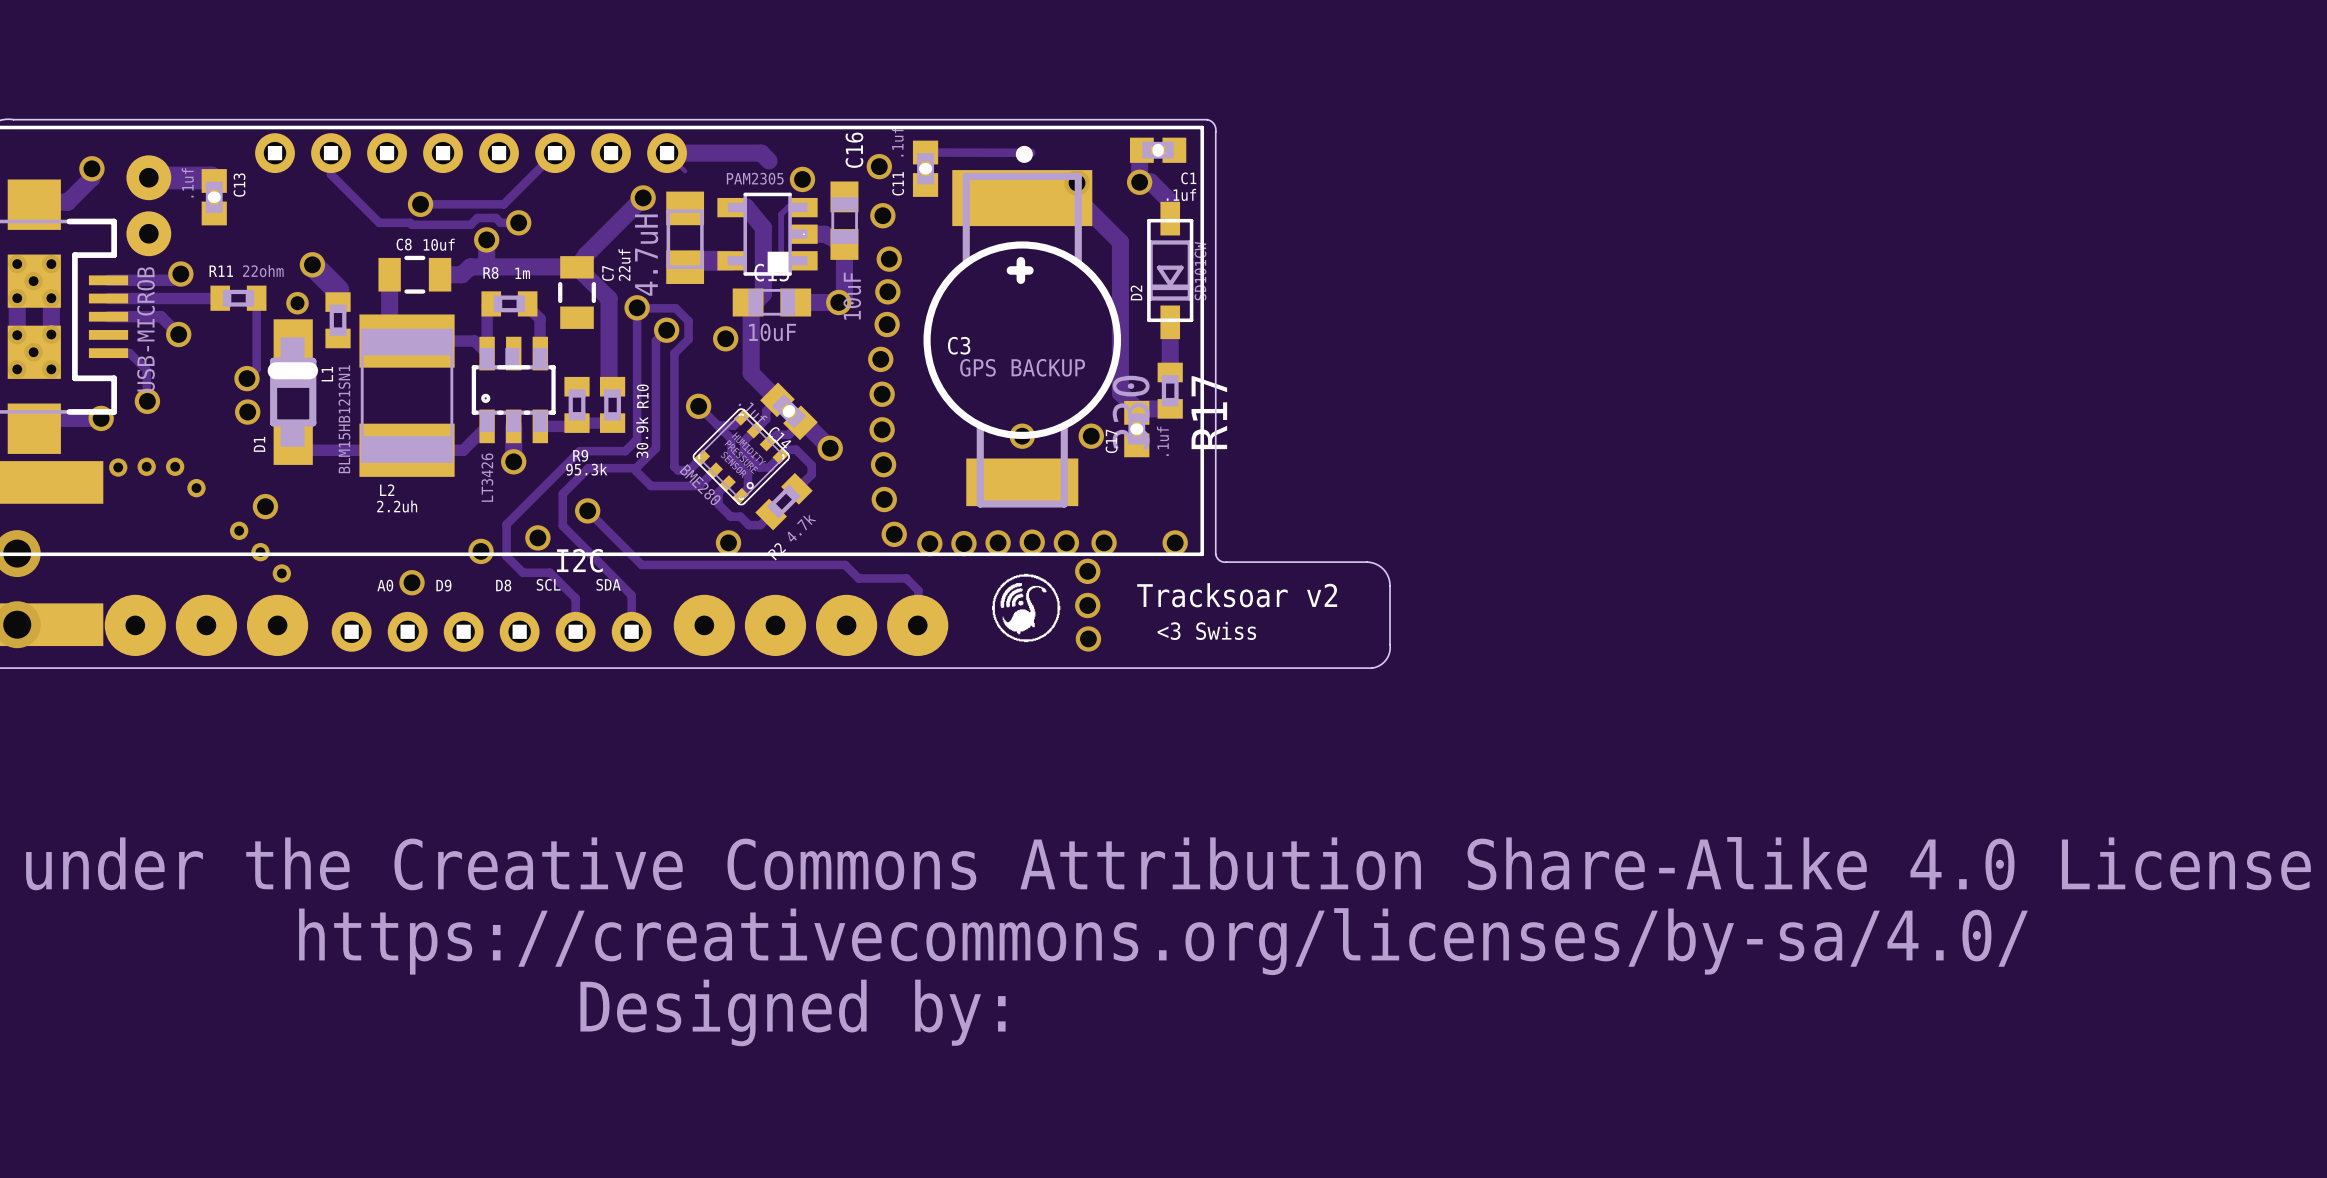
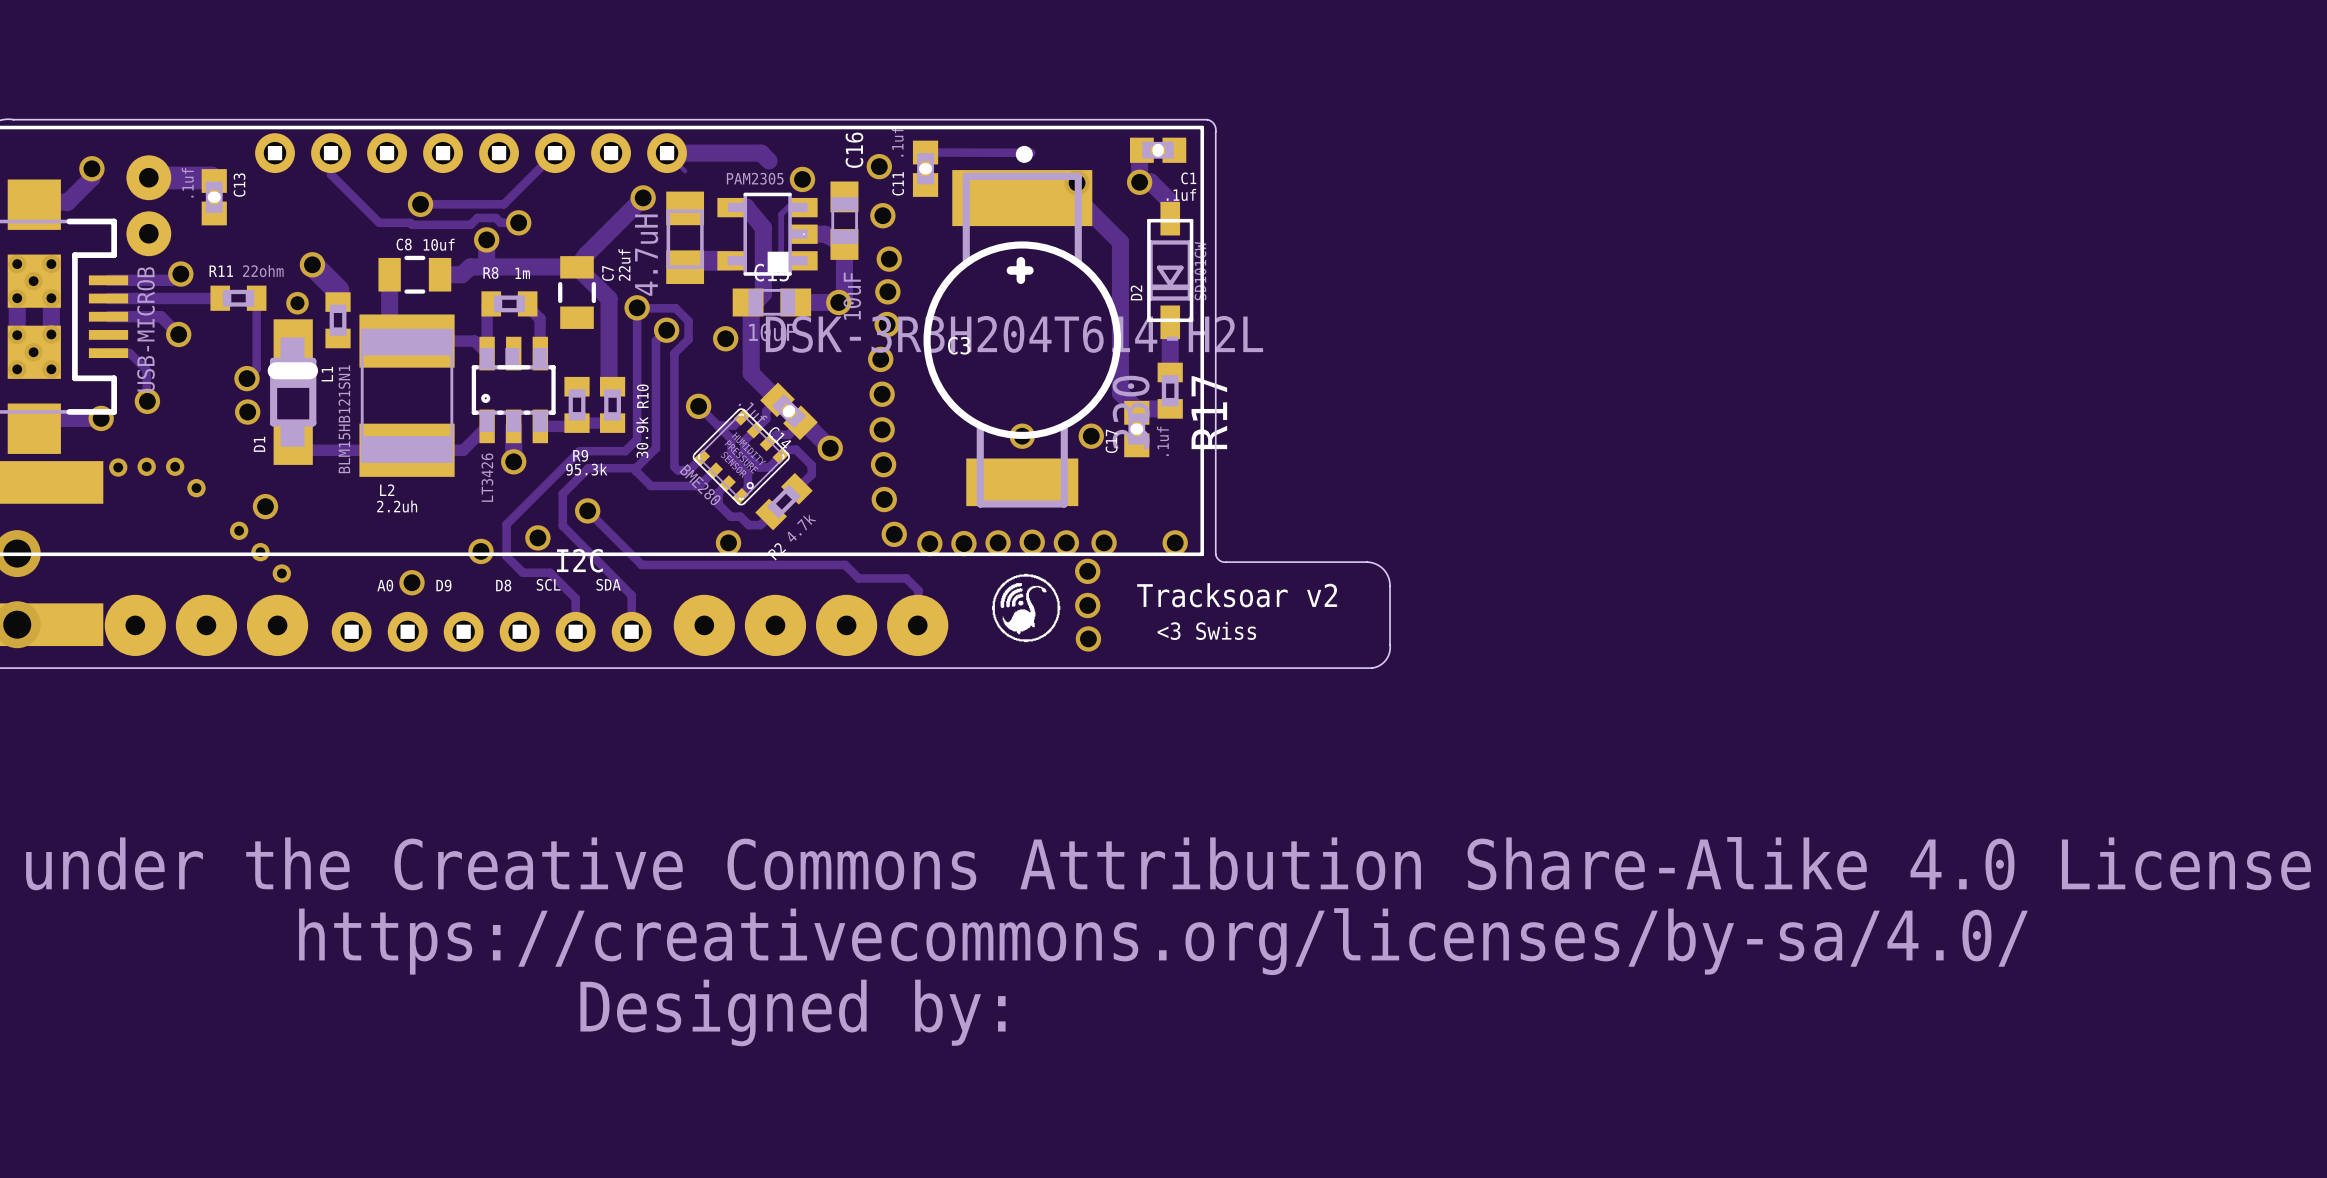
C3 value: GPS BACKUP (1022, 367) -> DSK-3R3H204T614-H2L (1014, 334)

